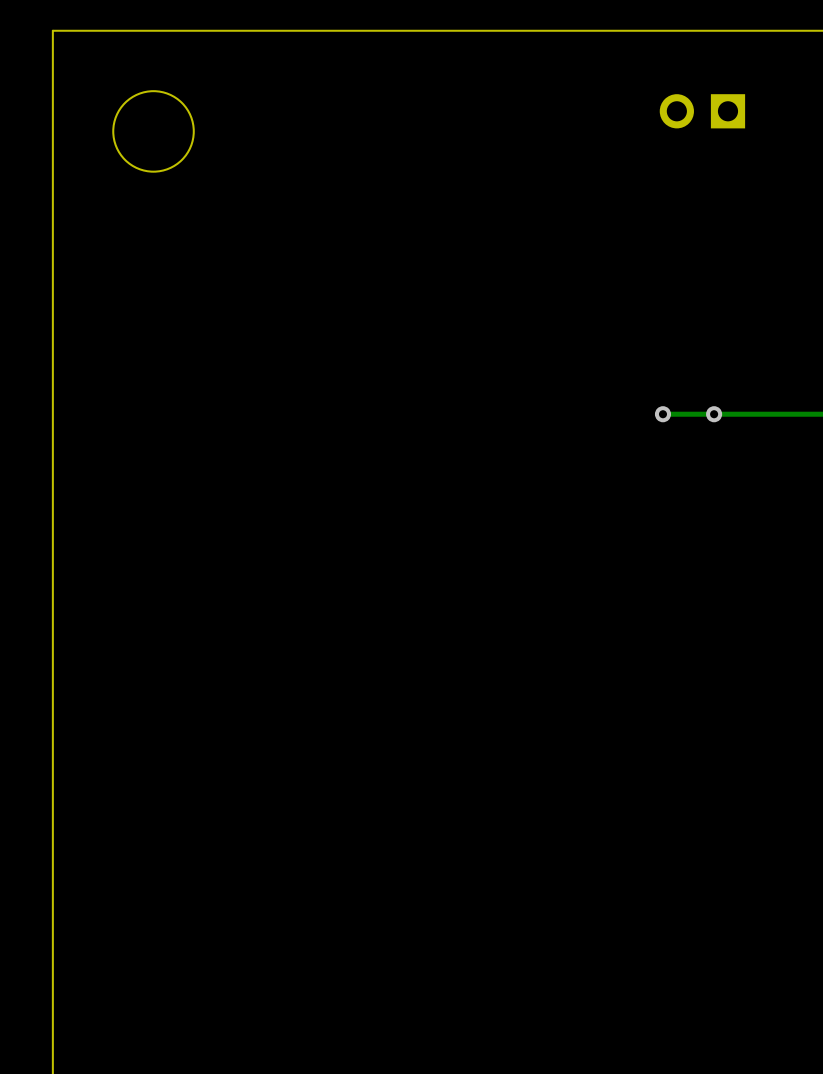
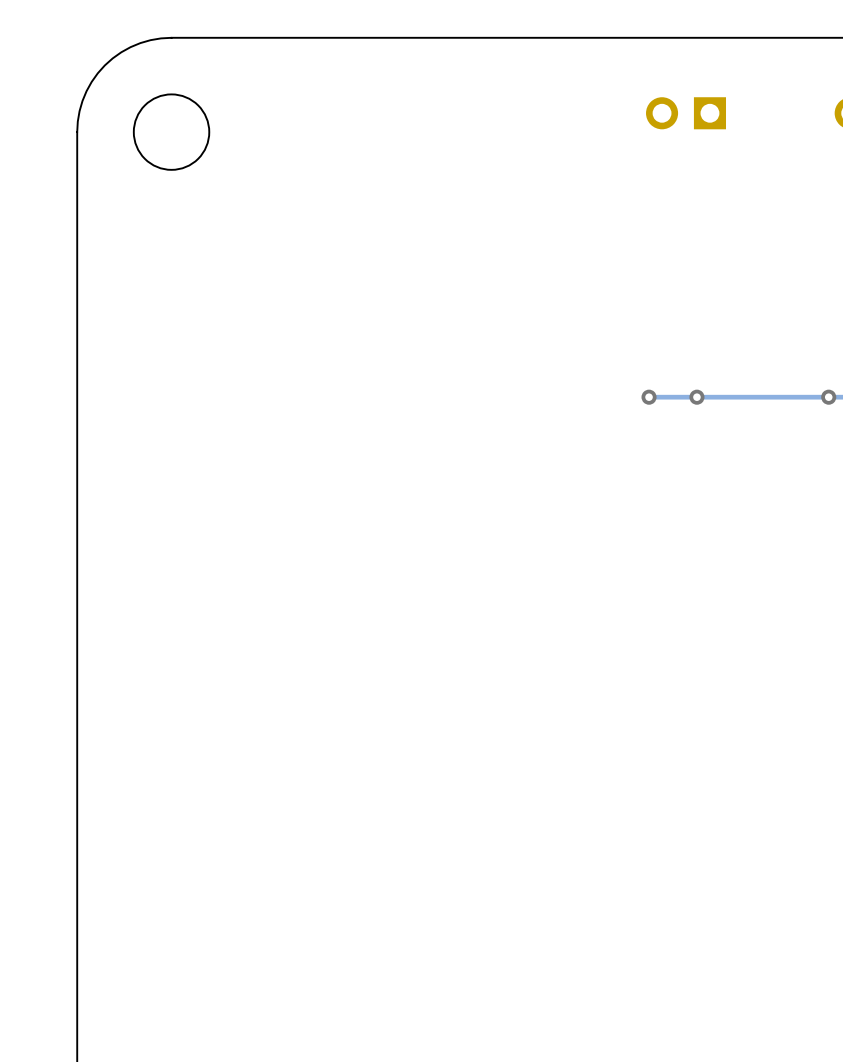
board edge: (153, 30) (52, 30) (52, 131) -> (171, 37) (150, 40) (130, 47) (104, 65) (91, 81) (82, 100) (77, 132)

